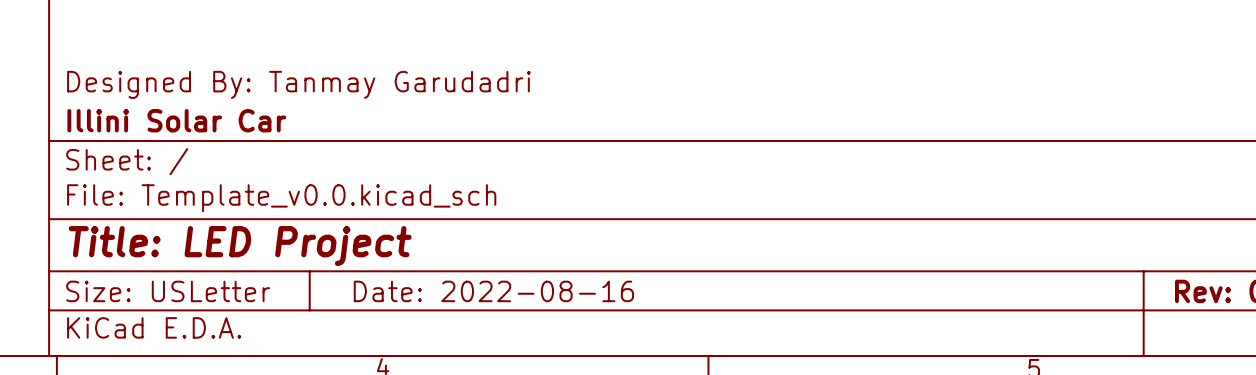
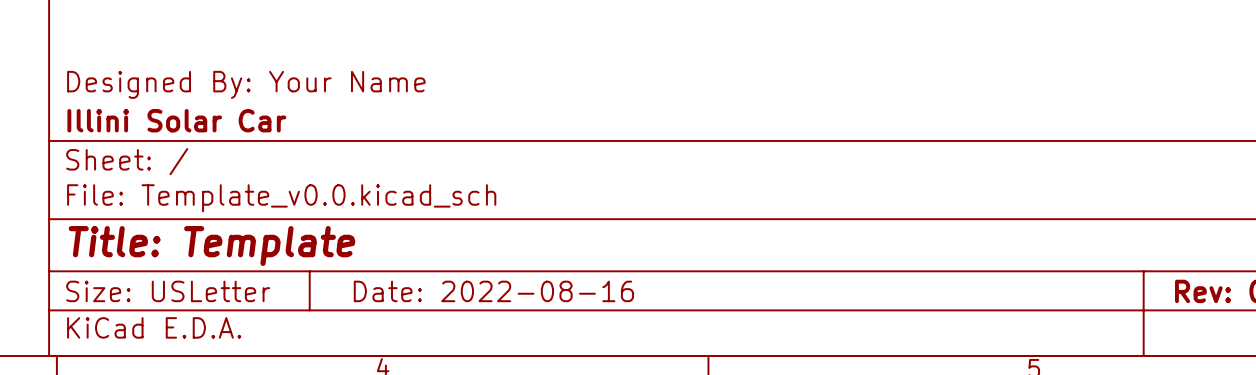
title block: Designed By: Tanmay Garudadri (298, 84) -> Designed By: Your Name (246, 84)
title block: Title: LED Project (240, 246) -> Title: Template (211, 246)

